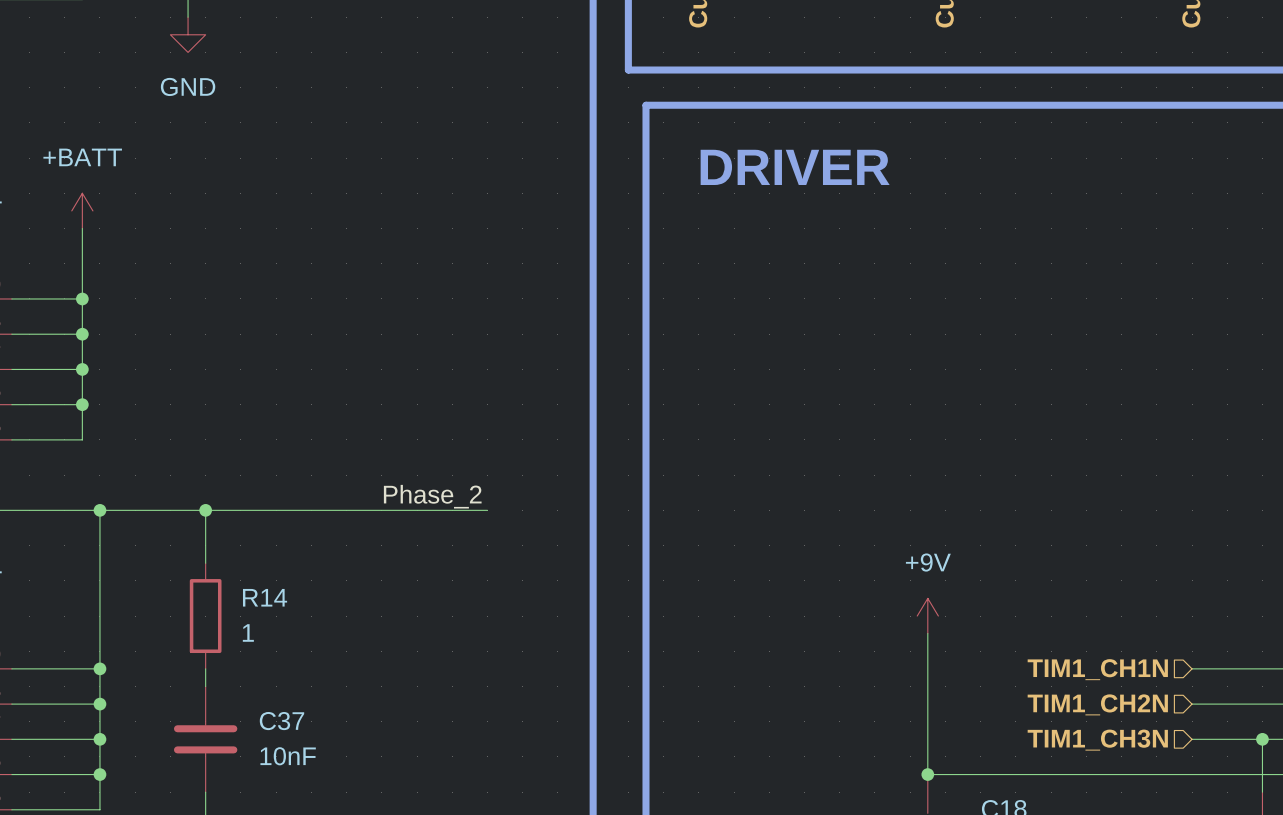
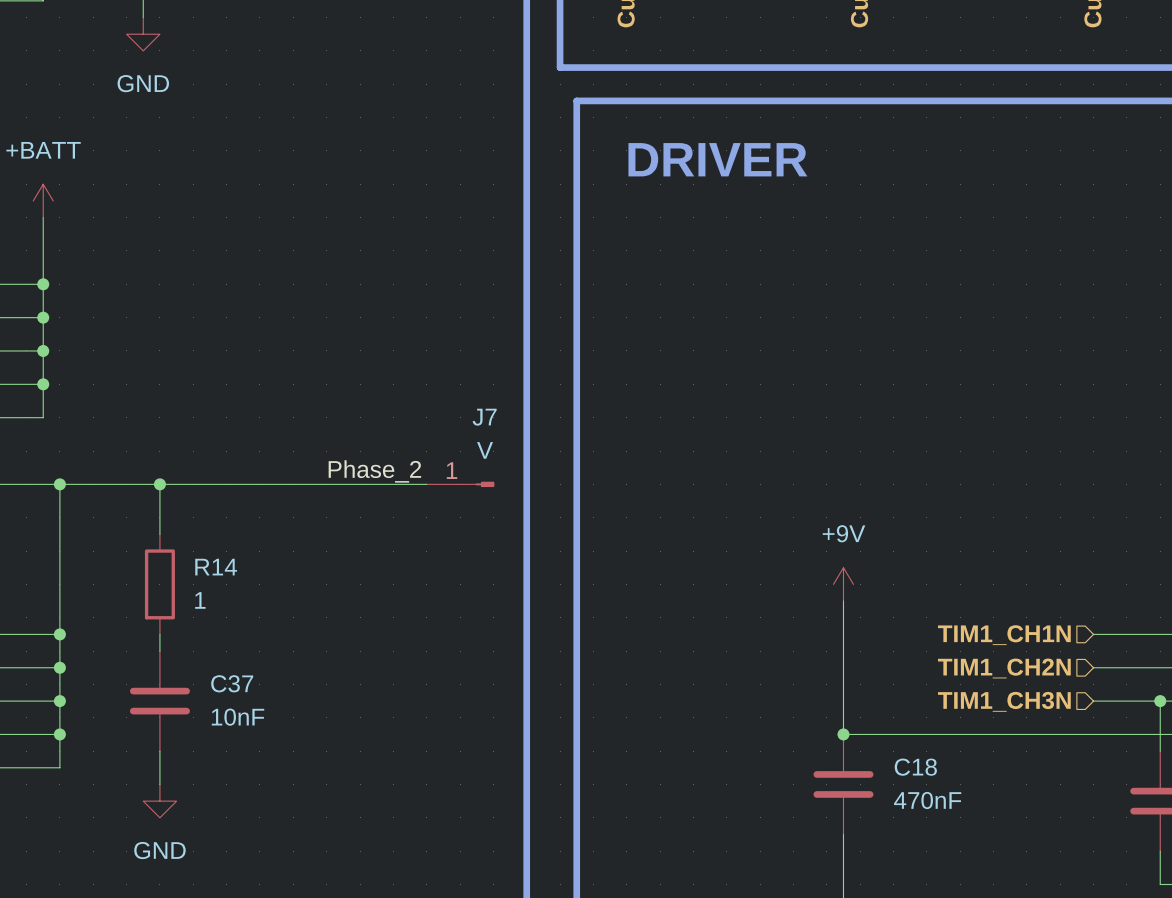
J7: none -> V (460, 484)

